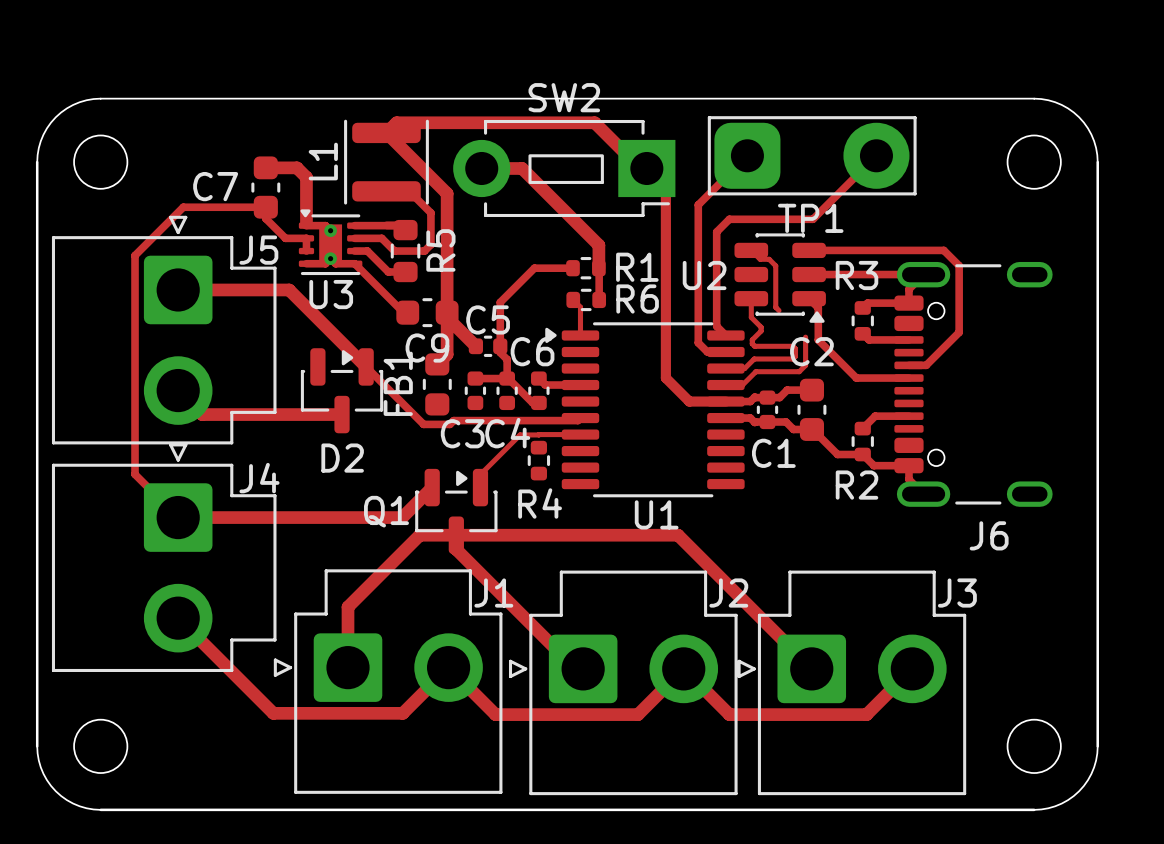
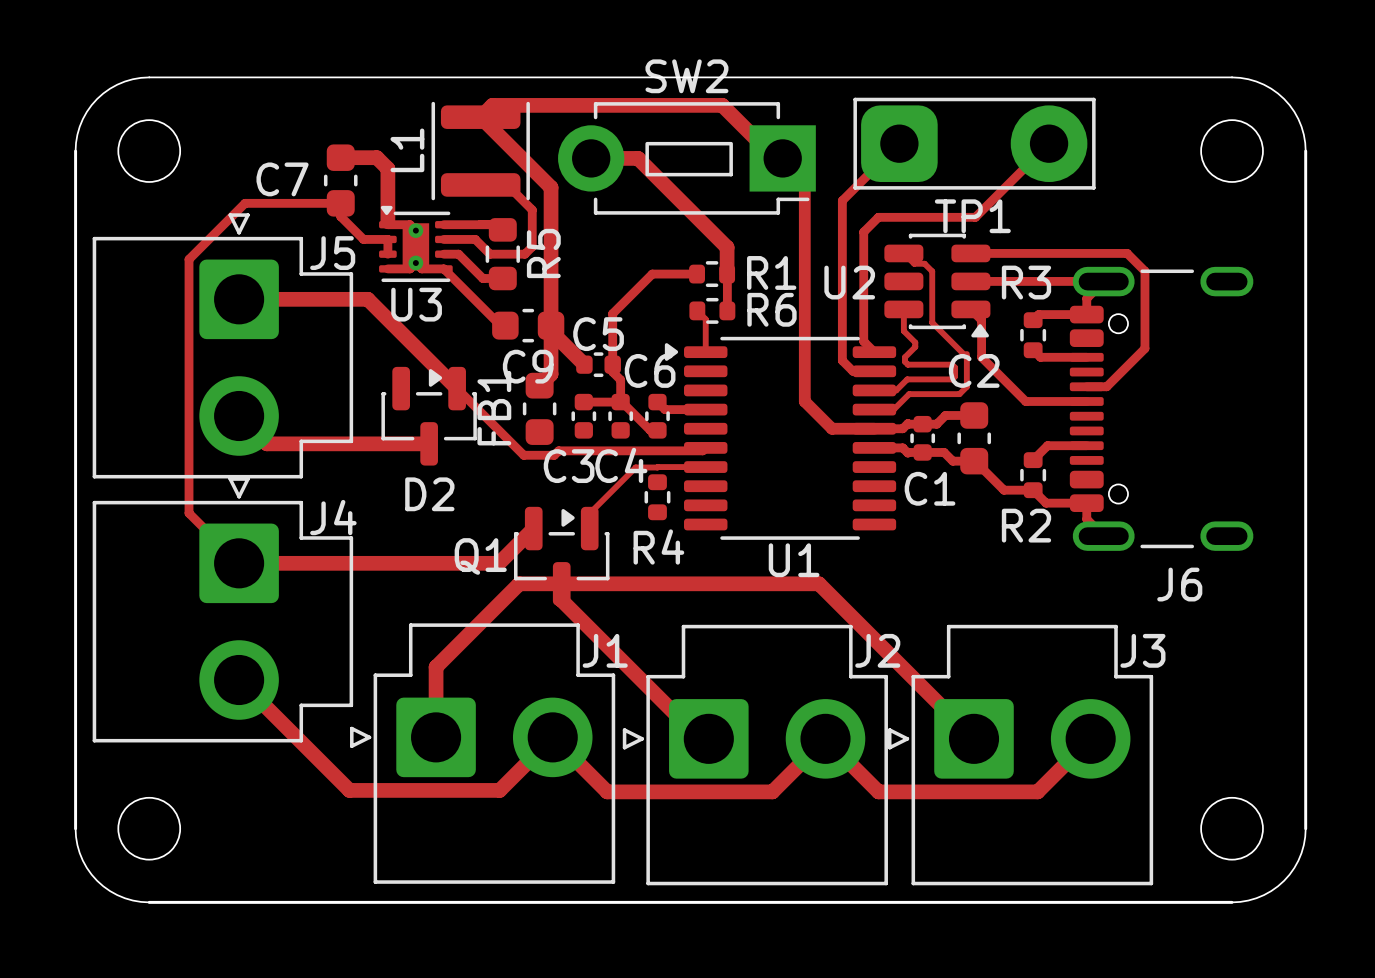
track: (775, 307) (778, 310) -> (932, 319) (932, 322) (966, 357)

